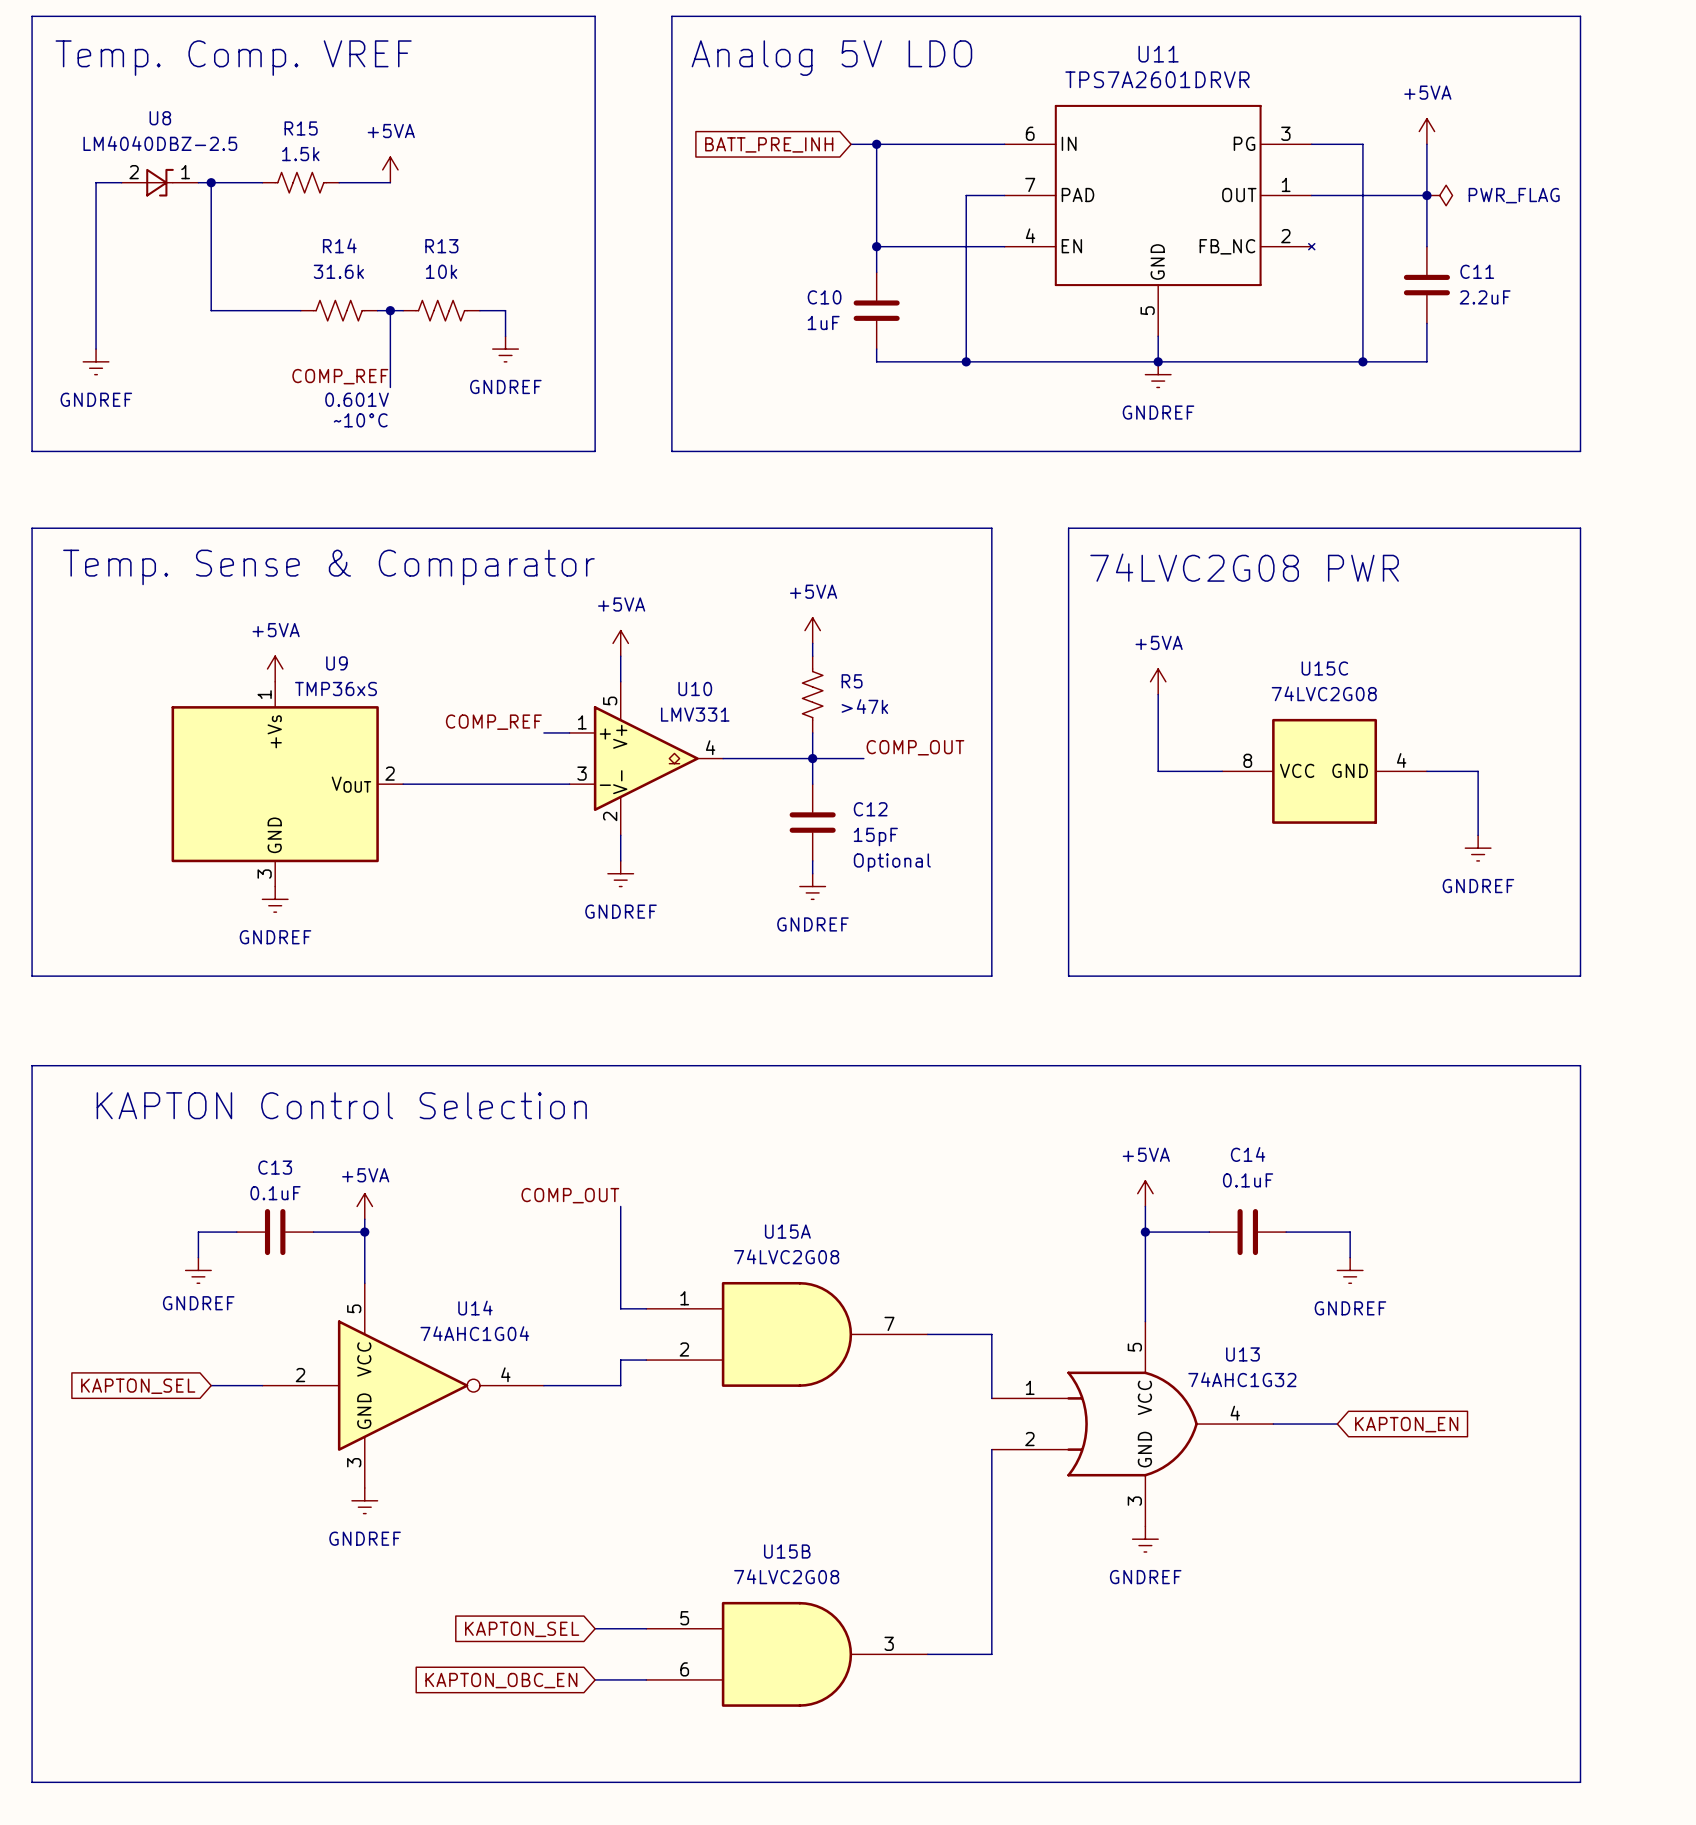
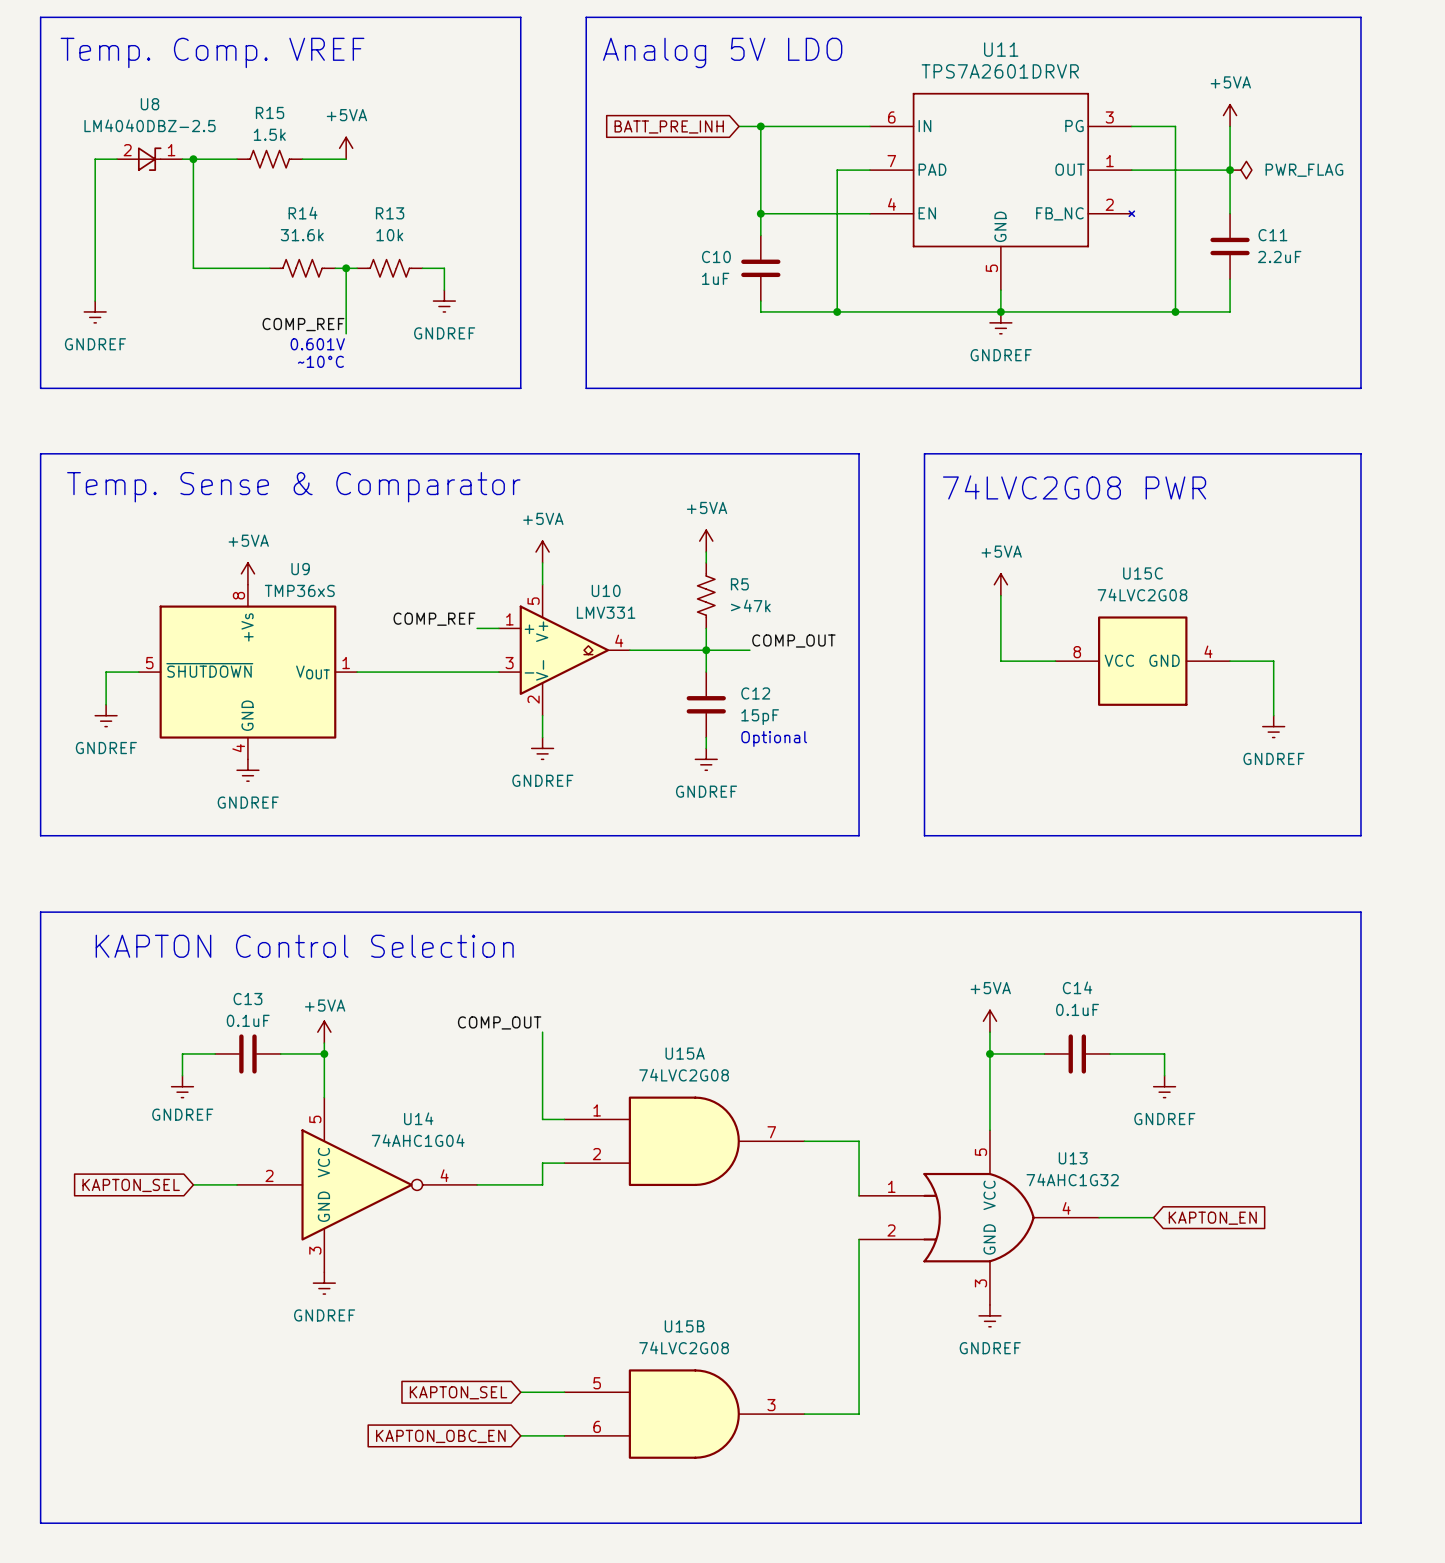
U9 symbol: [171, 681, 404, 887] -> [138, 584, 358, 760]
wire: none -> (138, 672) (106, 672) (106, 704)
power symbol: none -> GNDREF (106, 715)

